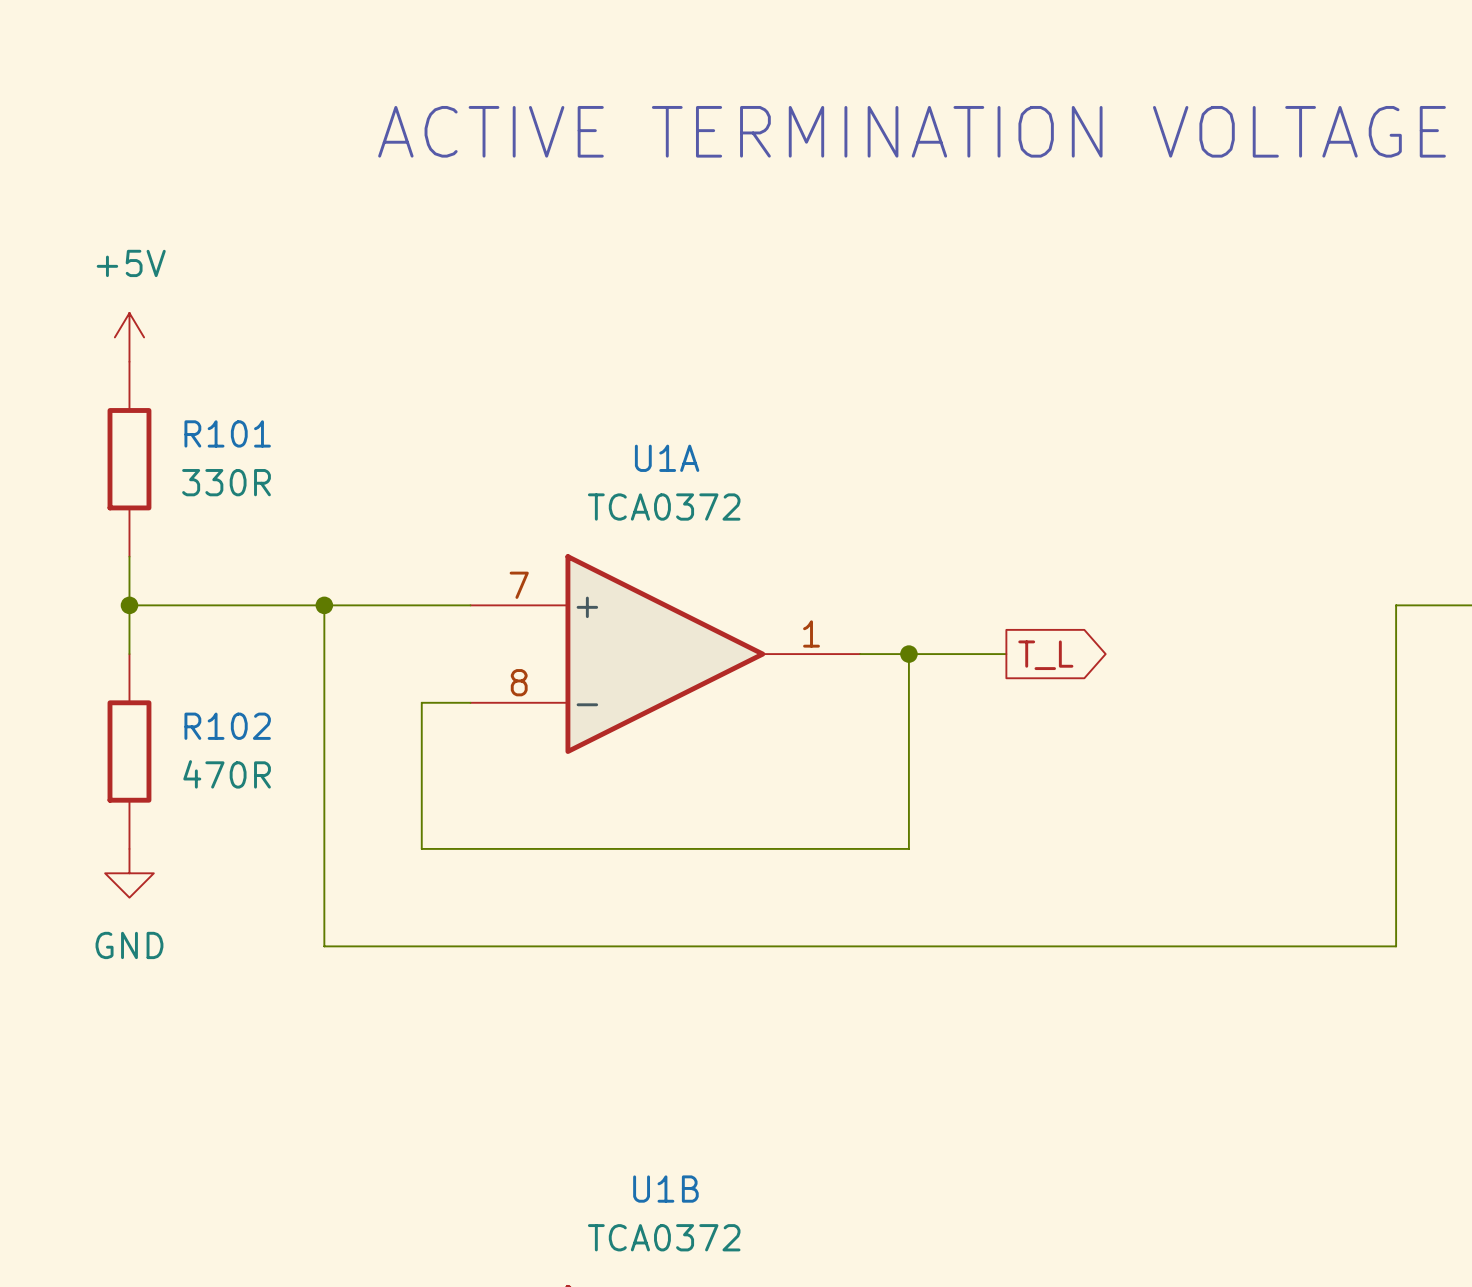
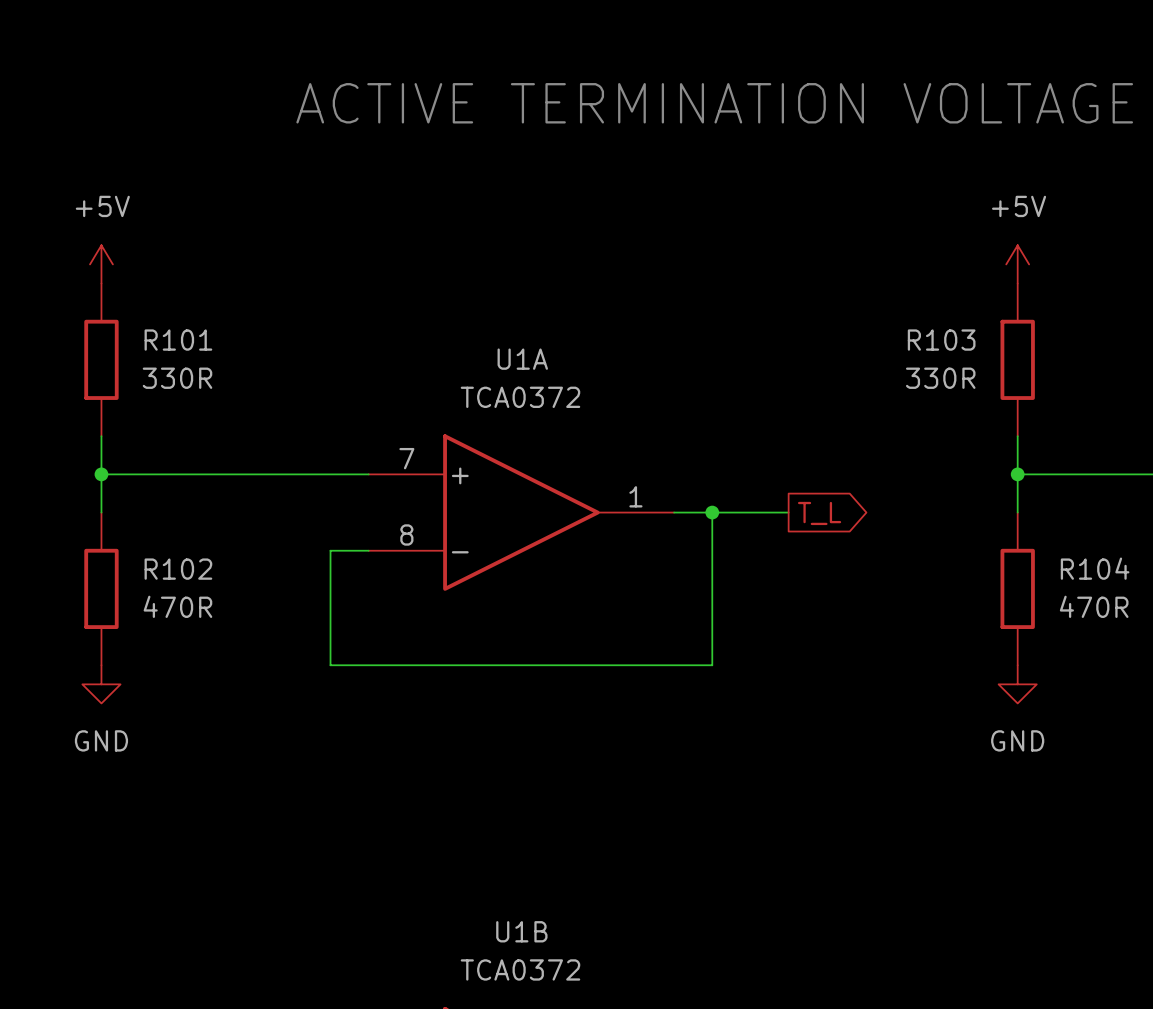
power symbol: none -> +5V (1017, 264)
R103: none -> 330R (1017, 359)
wire: none -> (1017, 436) (1017, 512)
wire: (324, 605) (324, 946) (1396, 946) (1396, 605) -> (1017, 474) (1094, 474)
junction: (324, 605) -> none
junction: none -> (1017, 474)
R104: none -> 470R (1017, 588)
power symbol: none -> GND (1017, 684)

